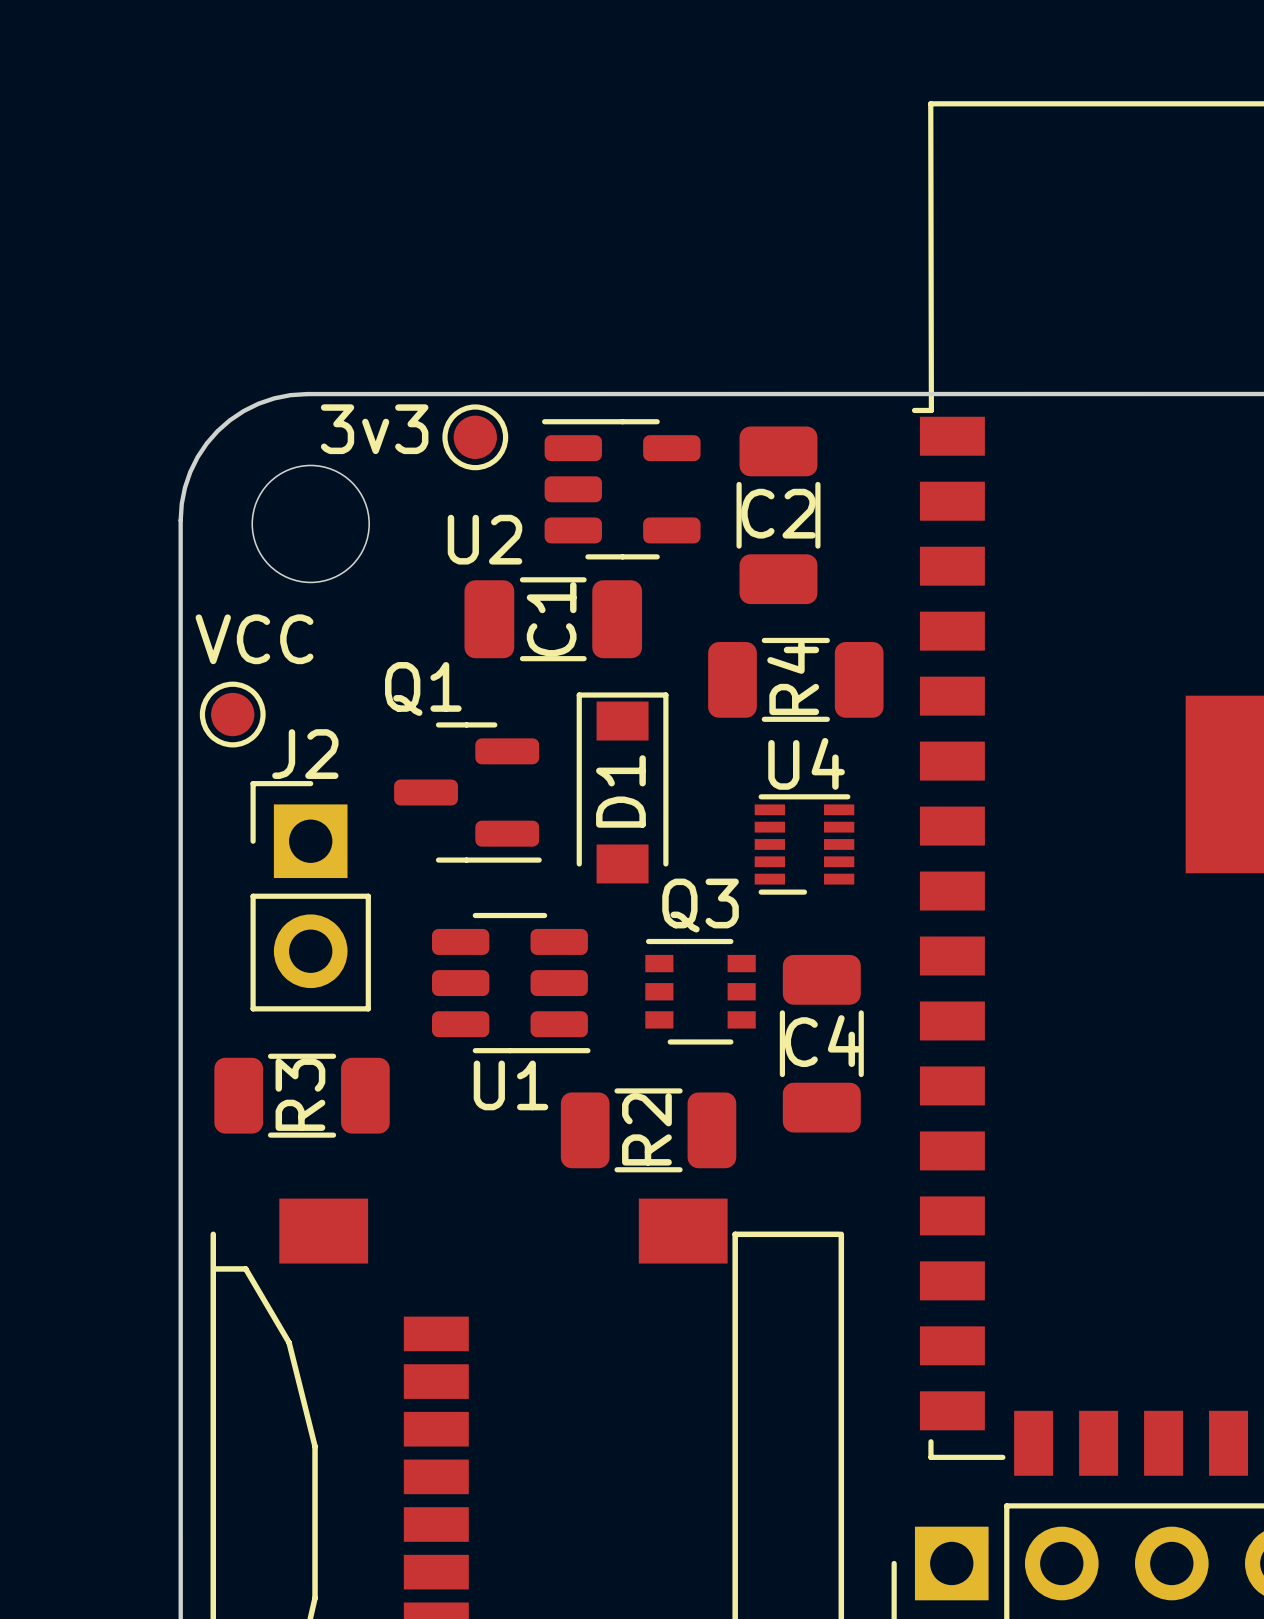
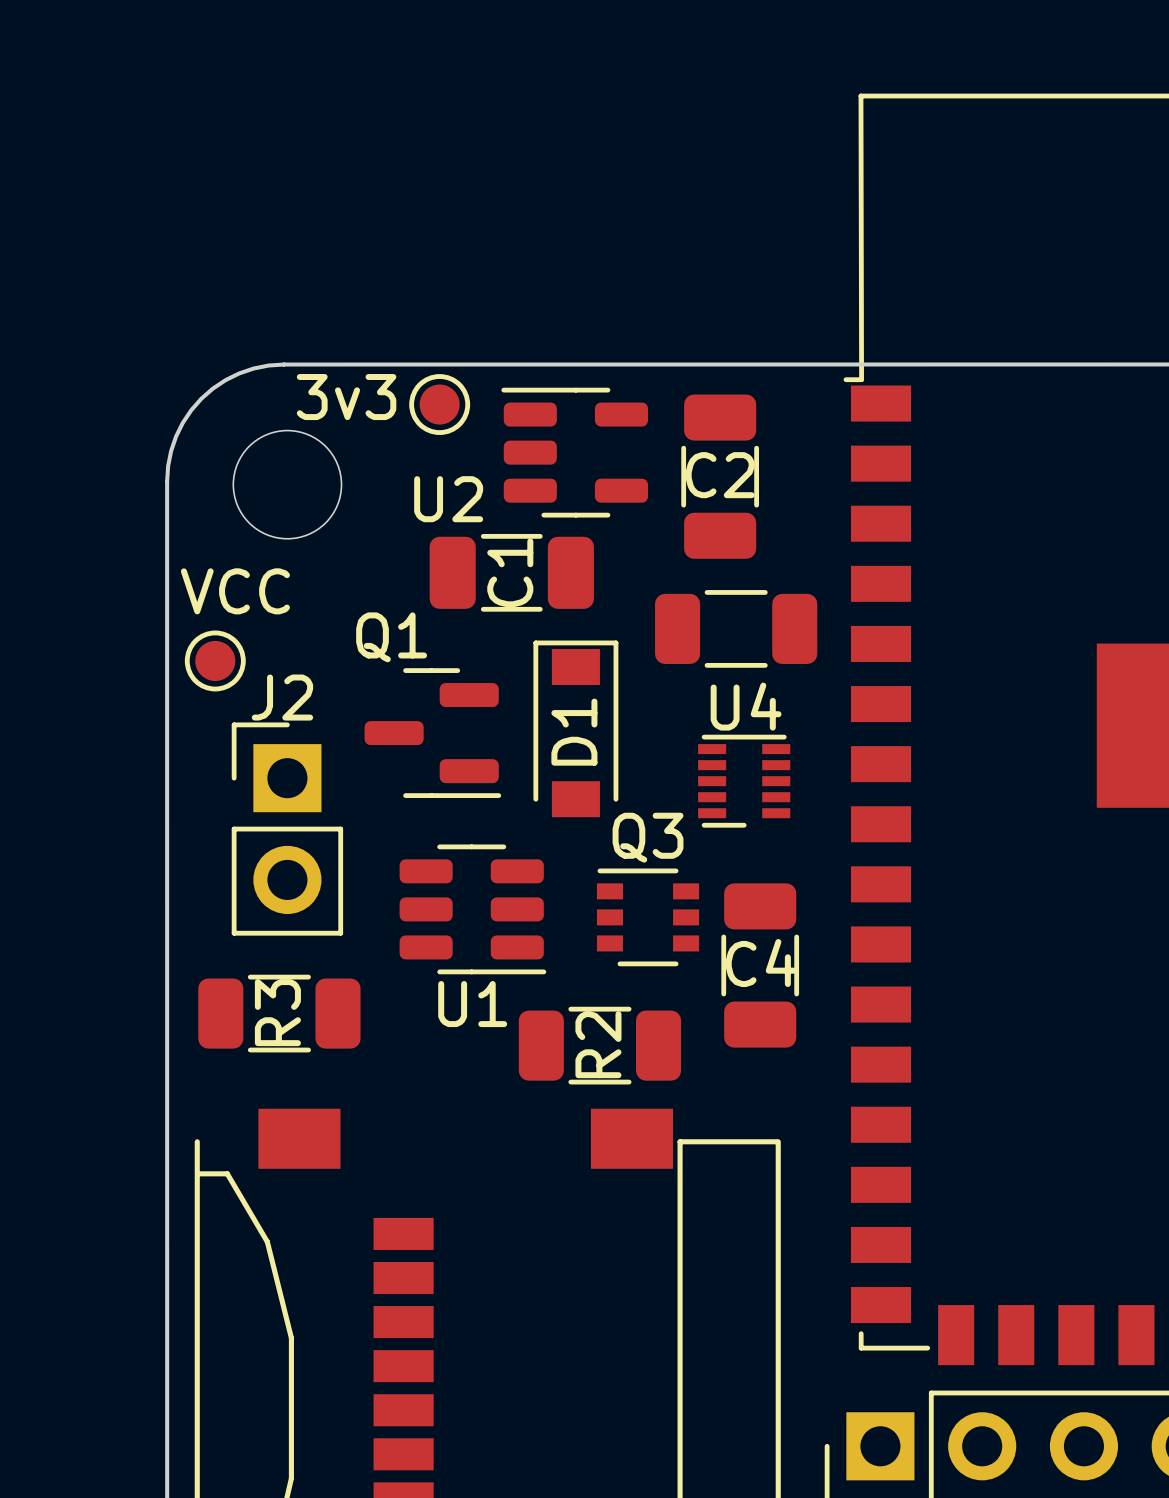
R4 name: R4 (793, 677) -> none

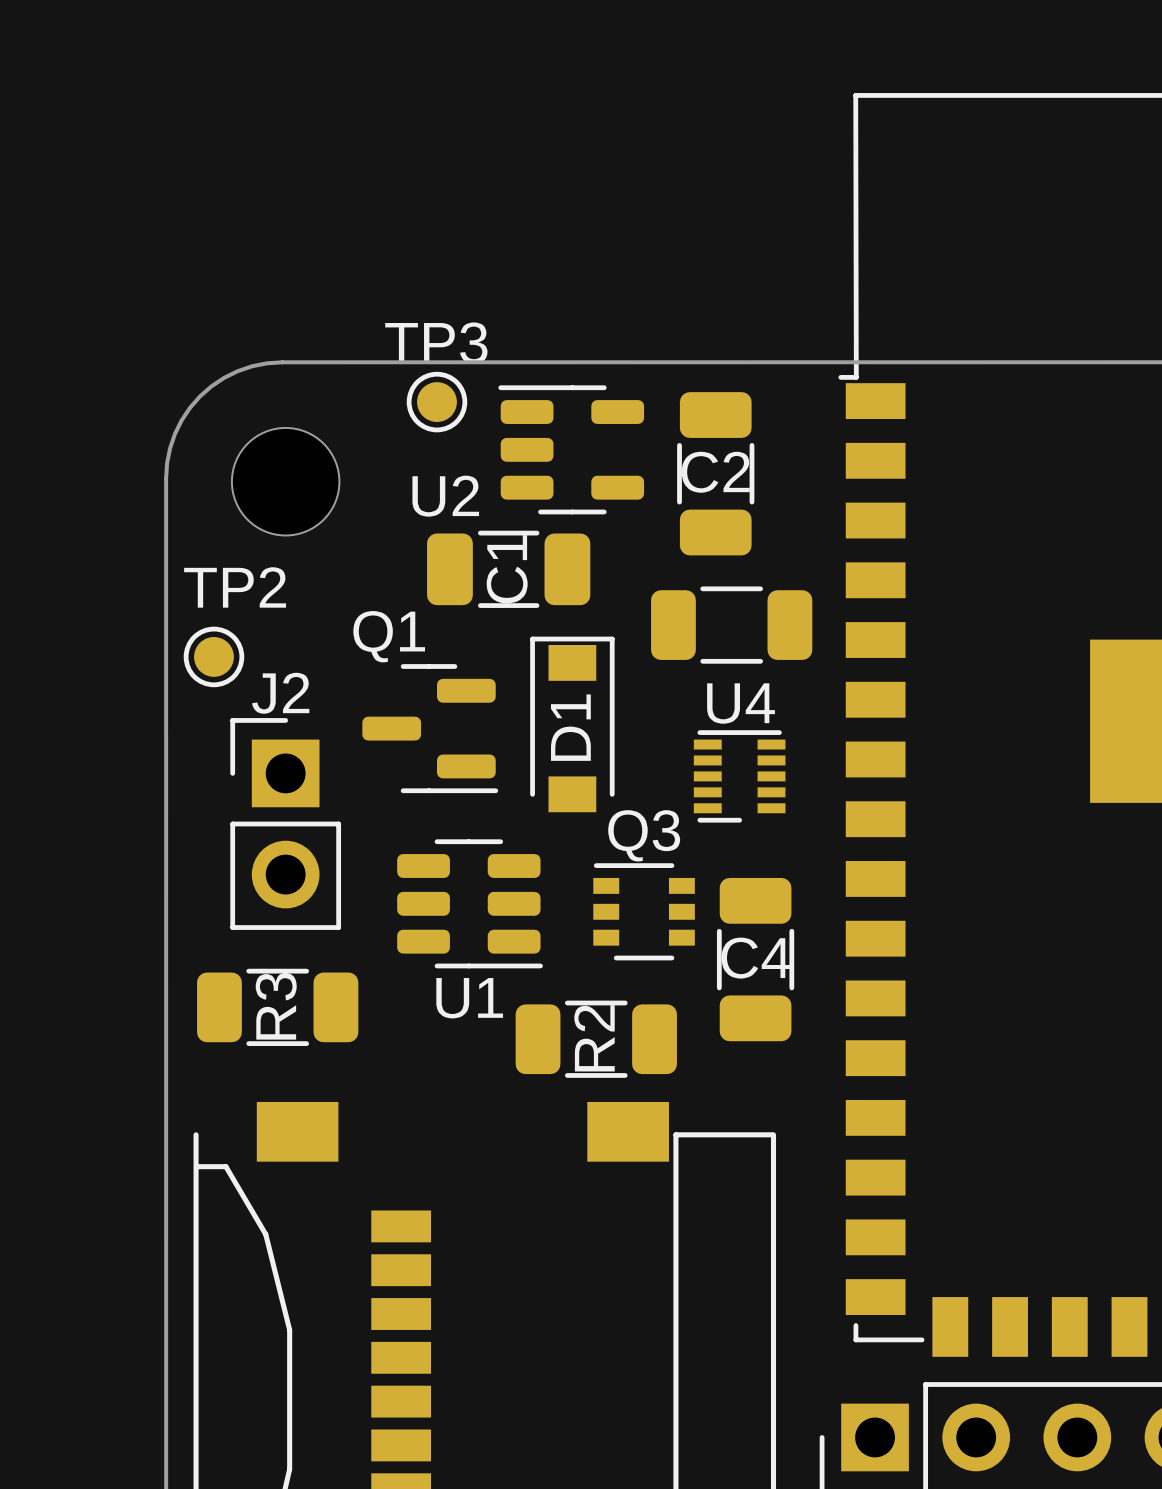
3v3 name: 3v3 (346, 397) -> TP3 (436, 342)
VCC name: VCC (235, 591) -> TP2 (235, 587)

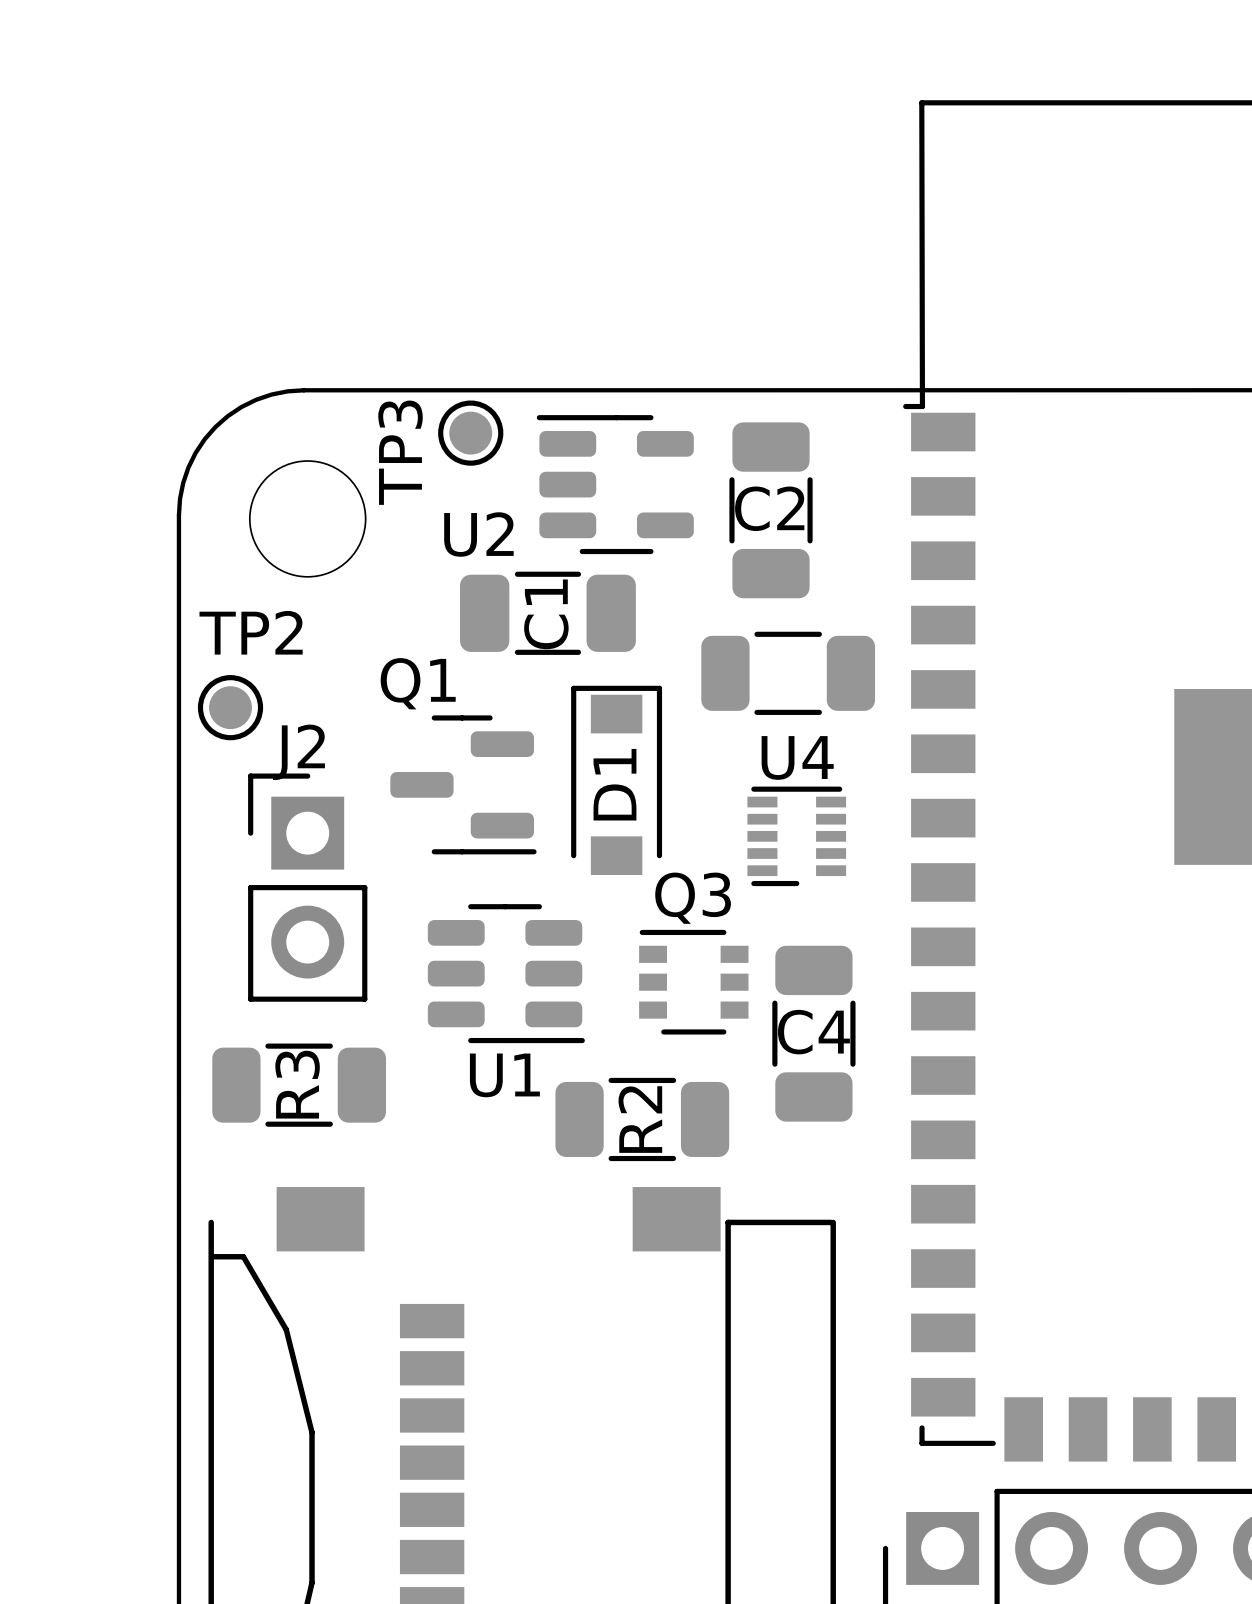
TP3 name rotation: 0° (436, 342) -> 90° counterclockwise (400, 452)

